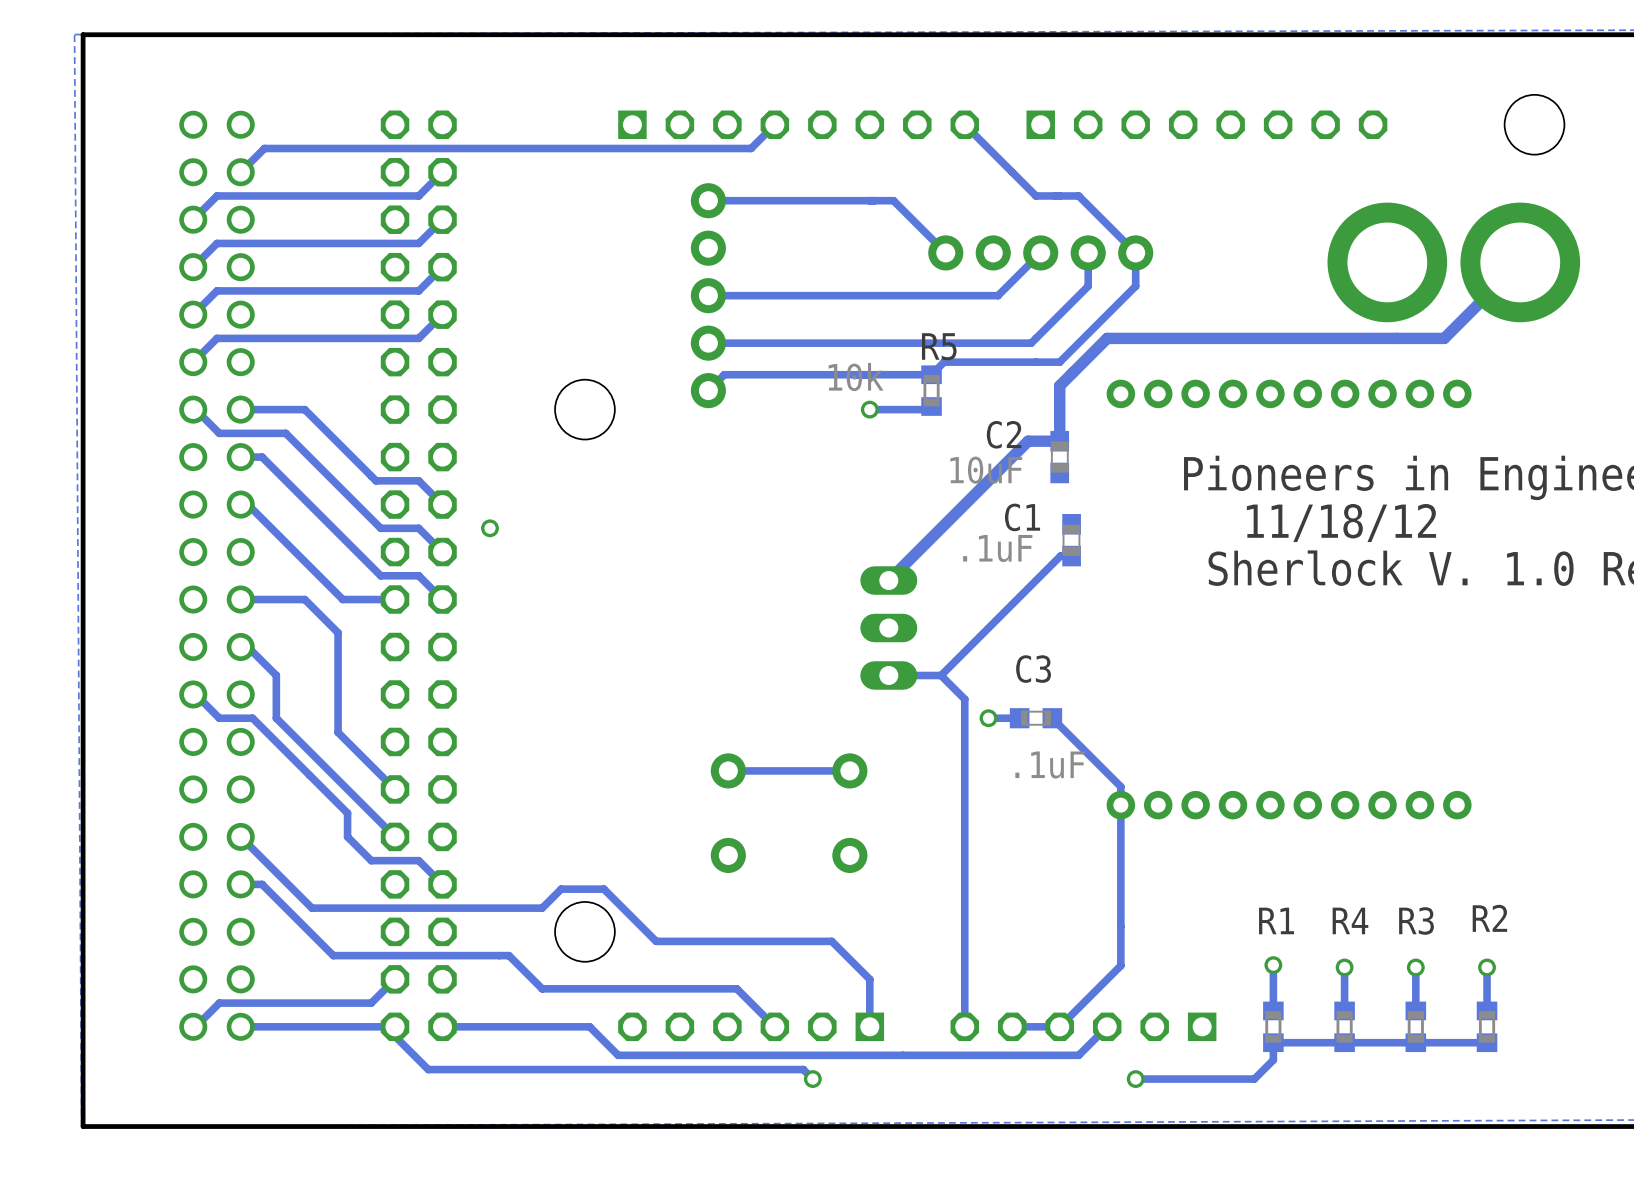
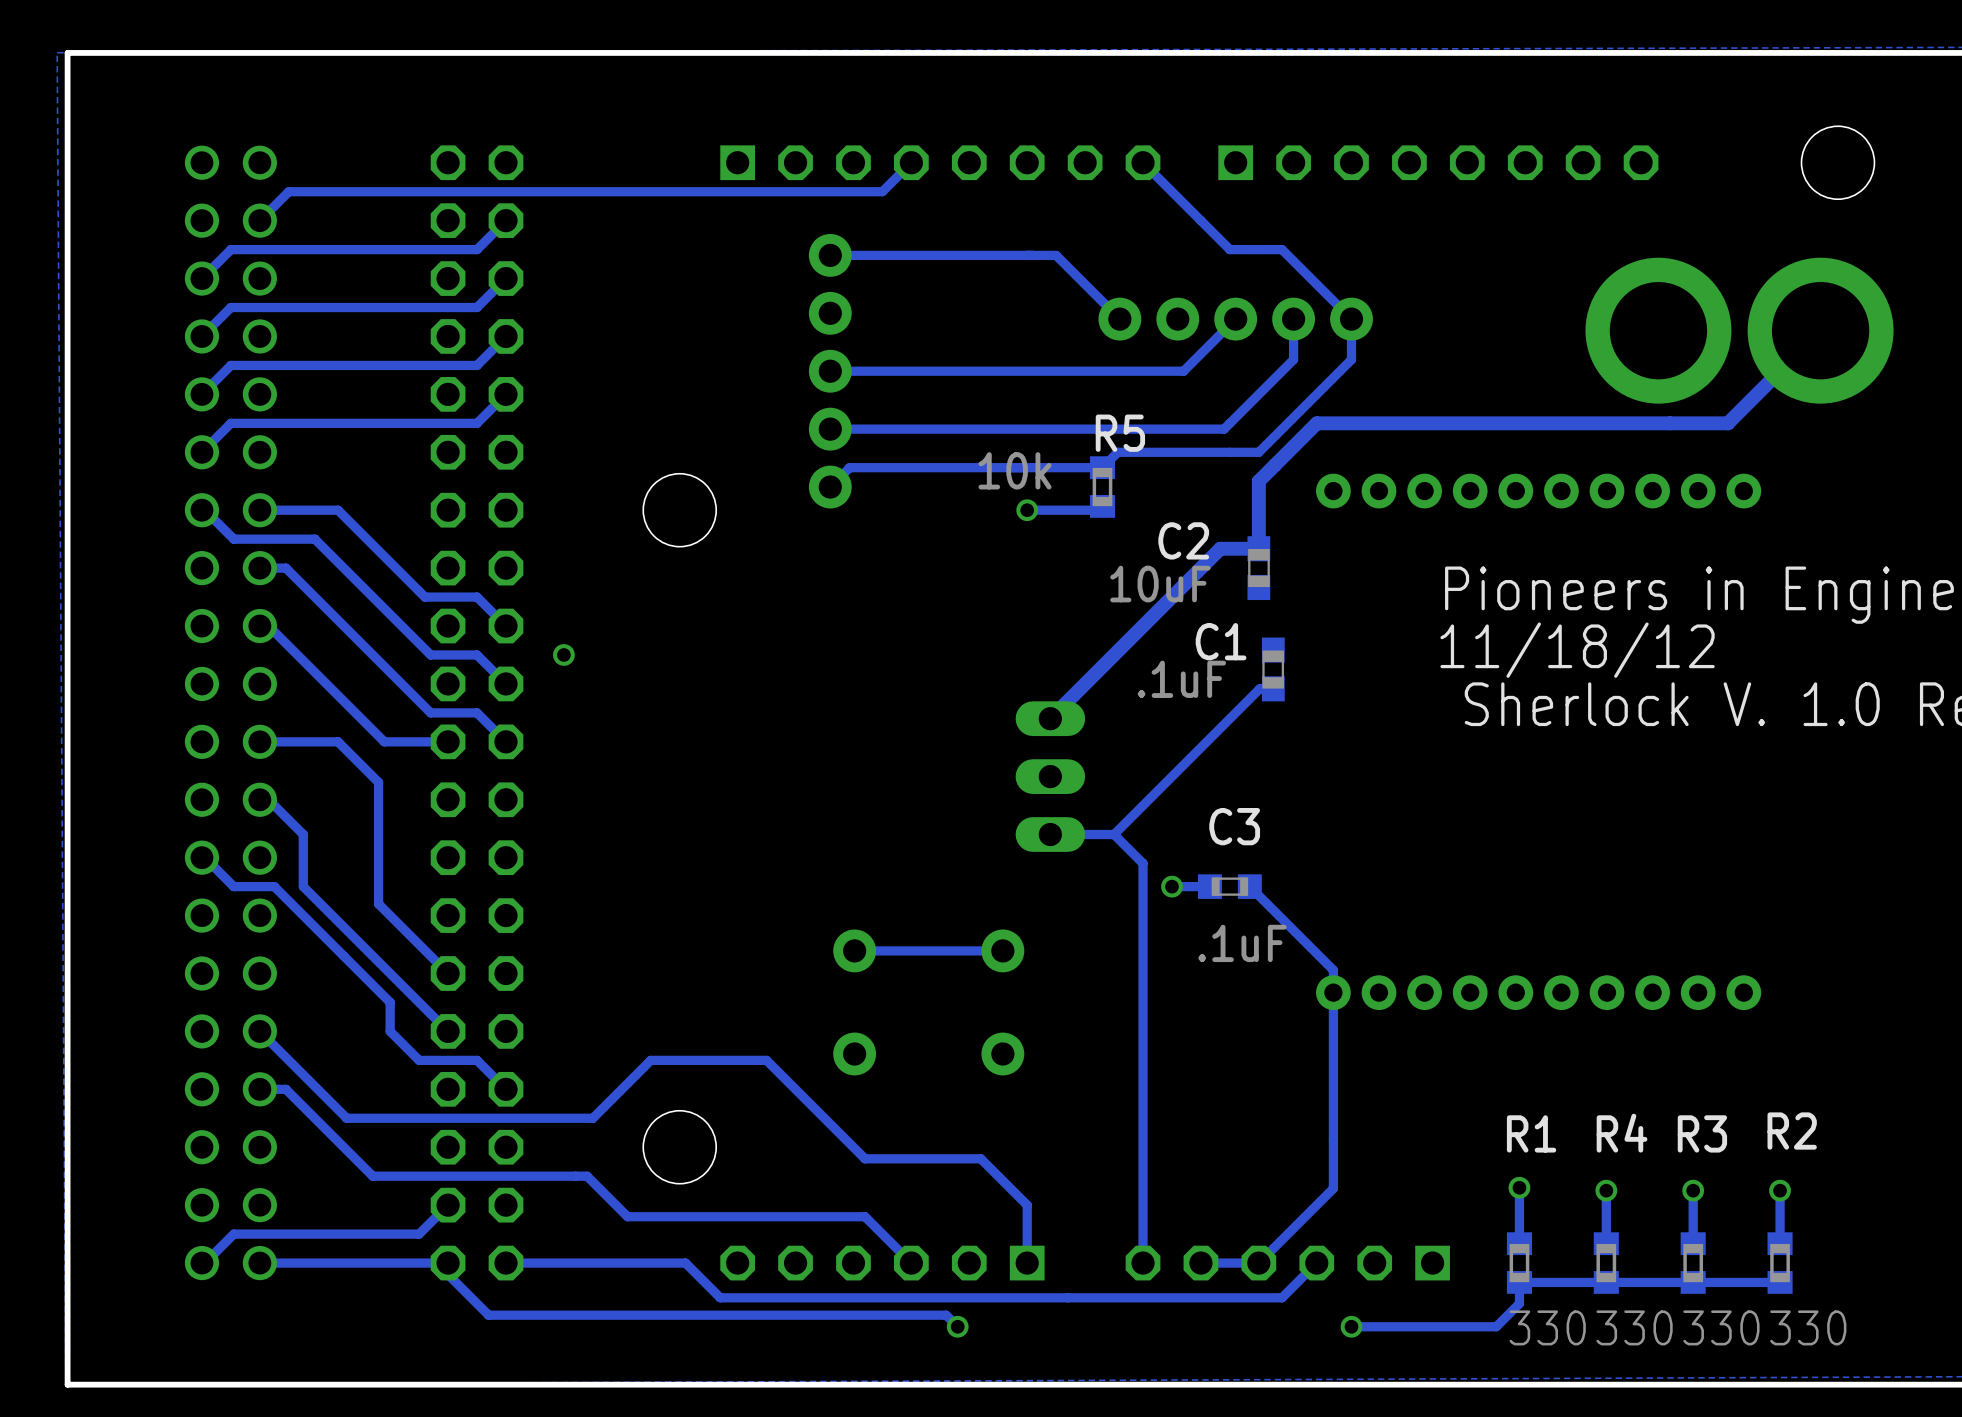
track: (513, 908) (542, 908) (561, 889) (603, 889) (656, 941) (736, 941) -> (592, 1118) (650, 1060) (766, 1060) (865, 1158)
R1 value: none -> 330 (1547, 1327)
R4 value: none -> 330 (1634, 1327)
R3 value: none -> 330 (1721, 1327)
R2 value: none -> 330 (1808, 1327)

